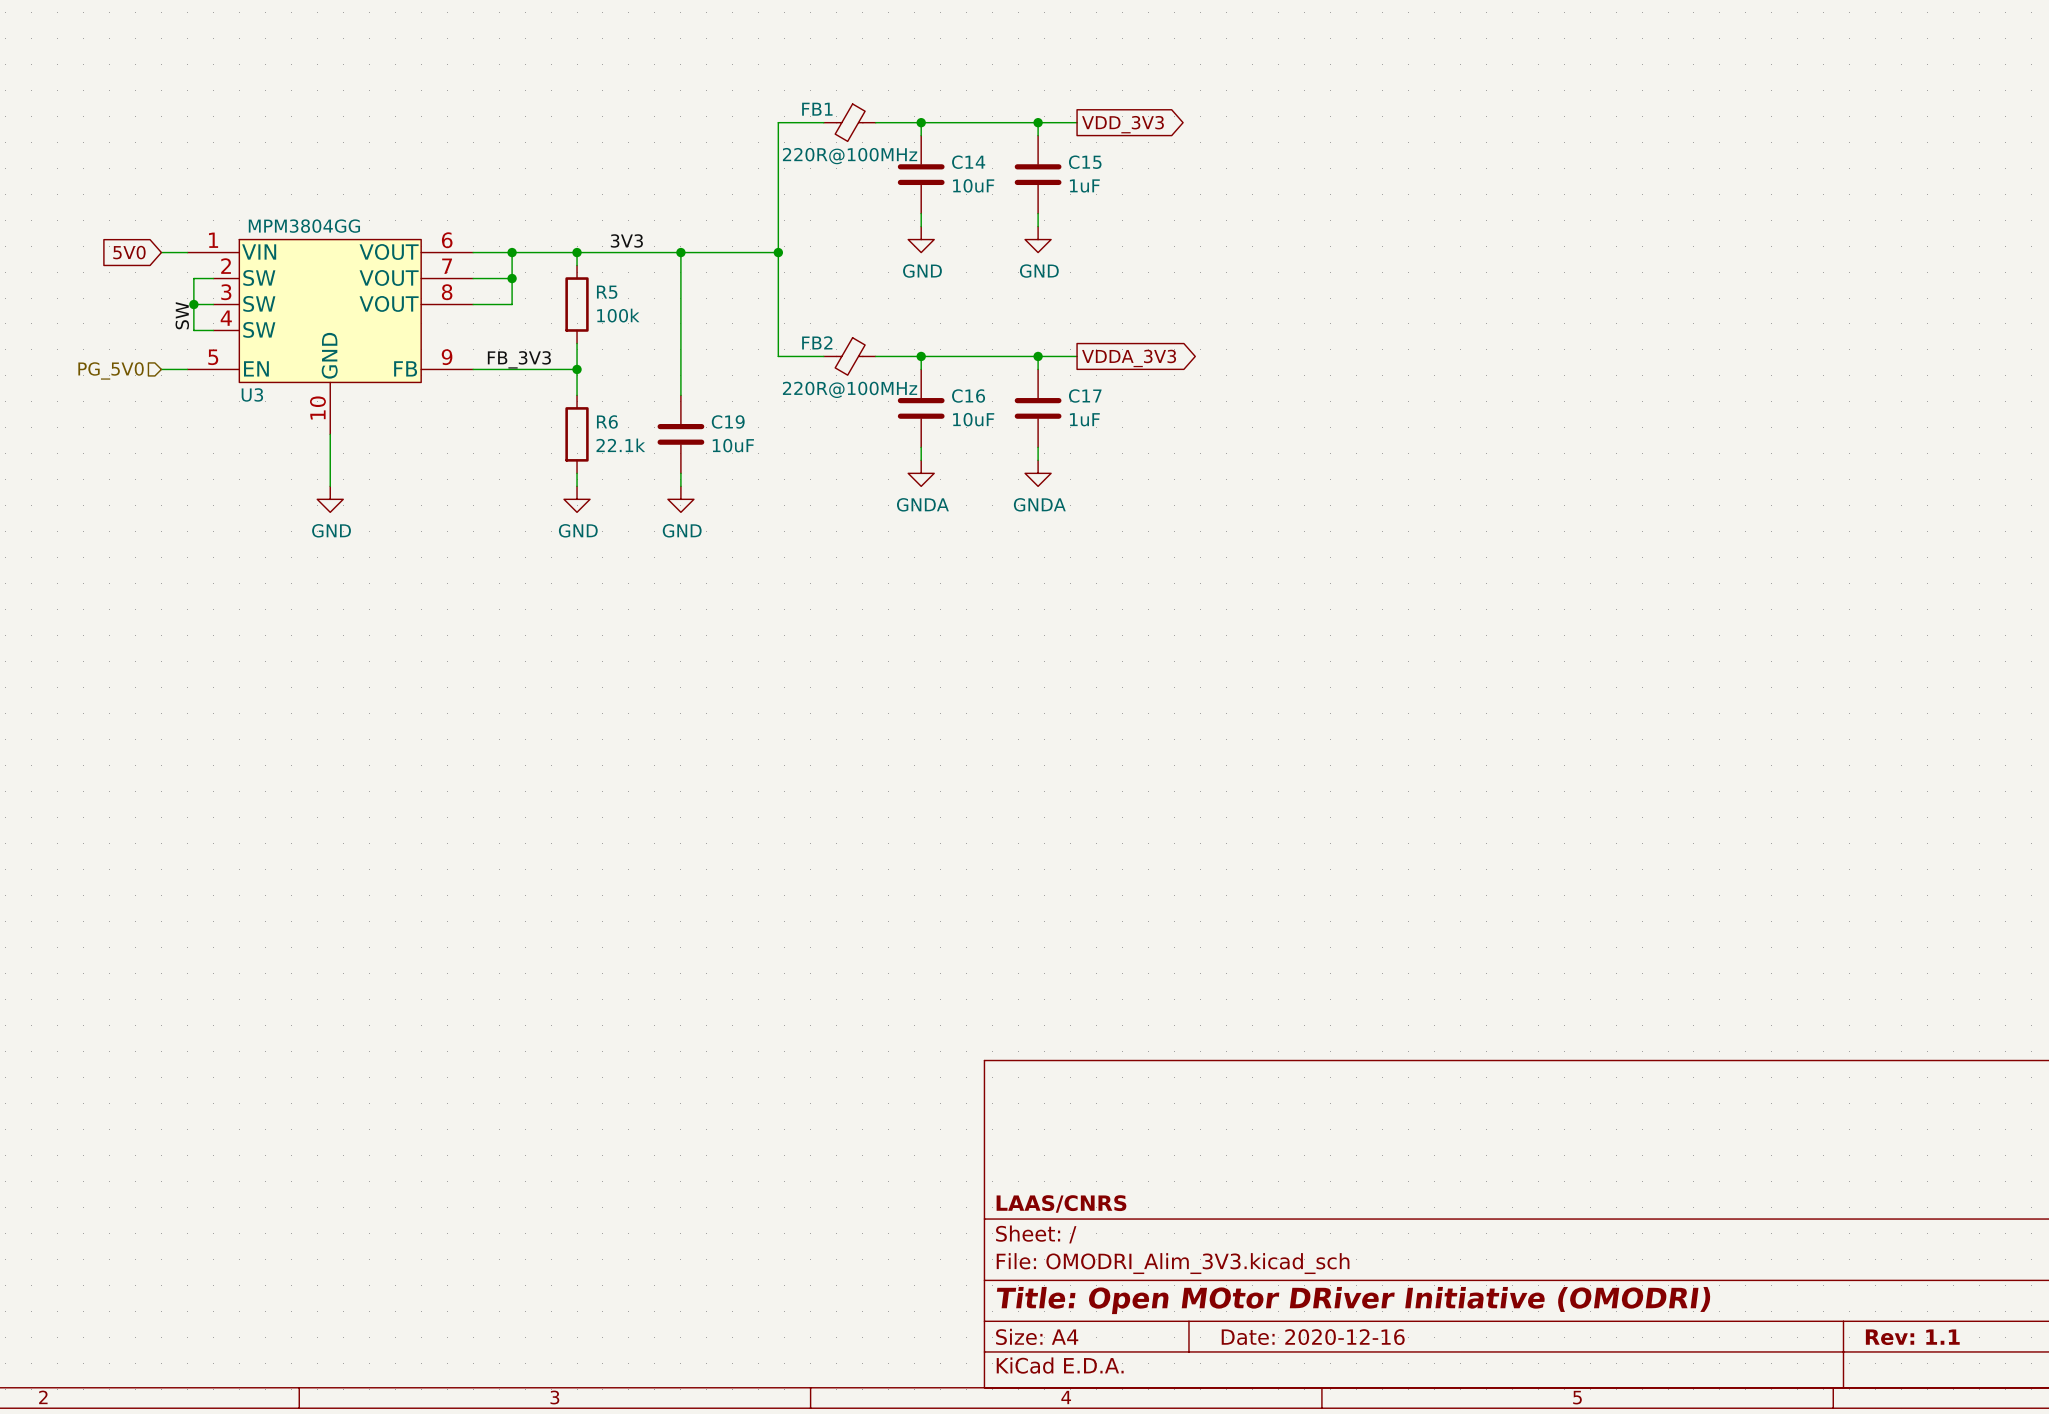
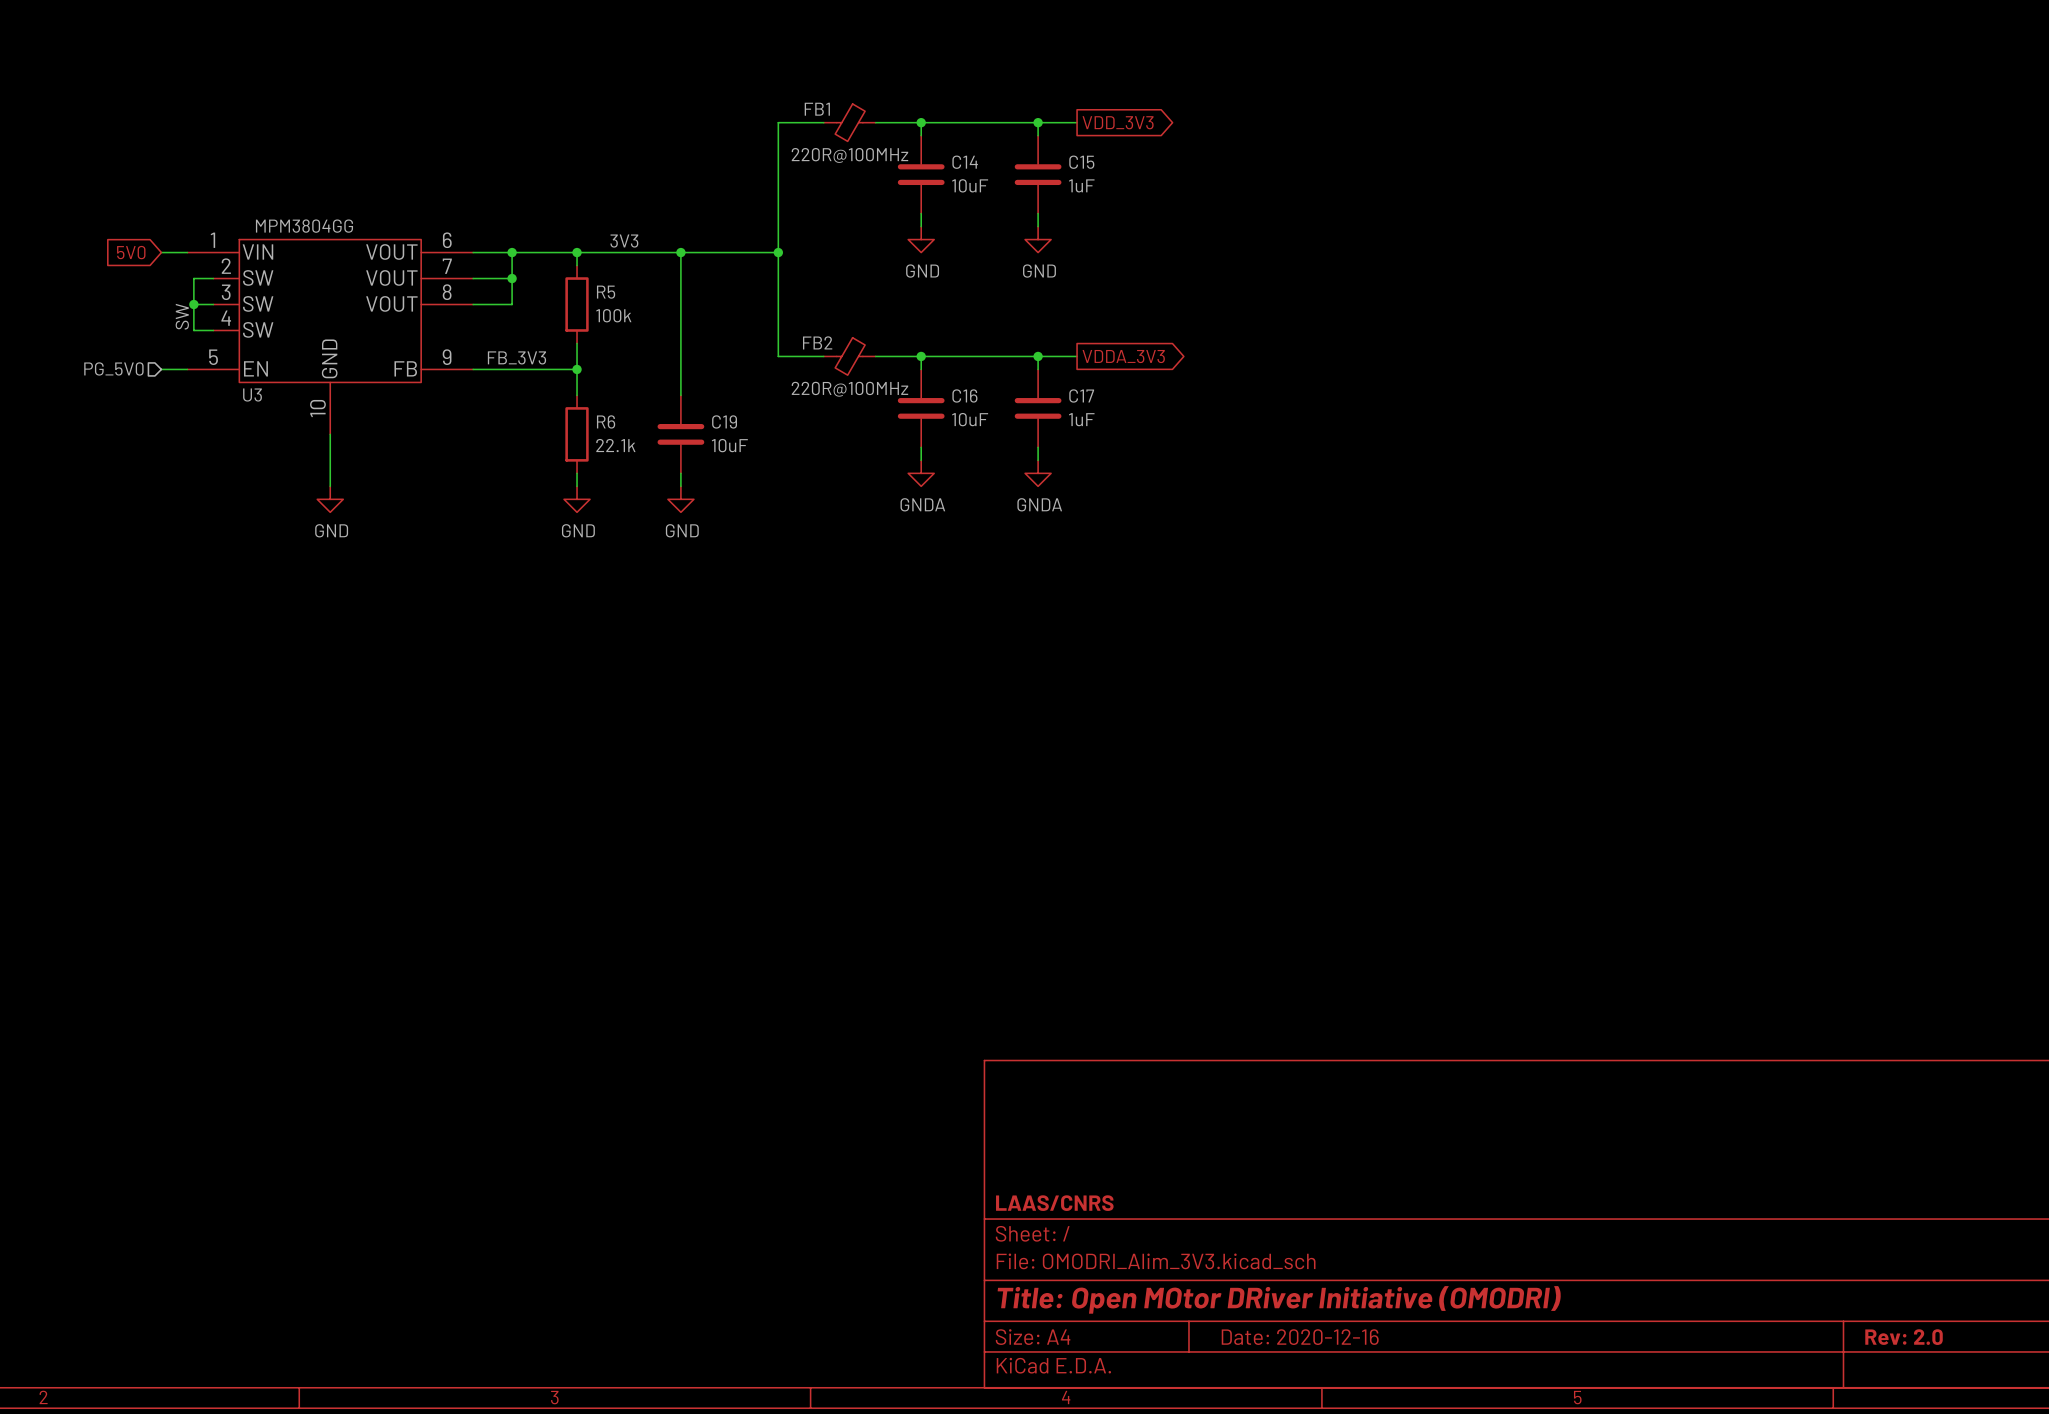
title block: Rev: 1.1 (1912, 1337) -> Rev: 2.0 (1904, 1337)

